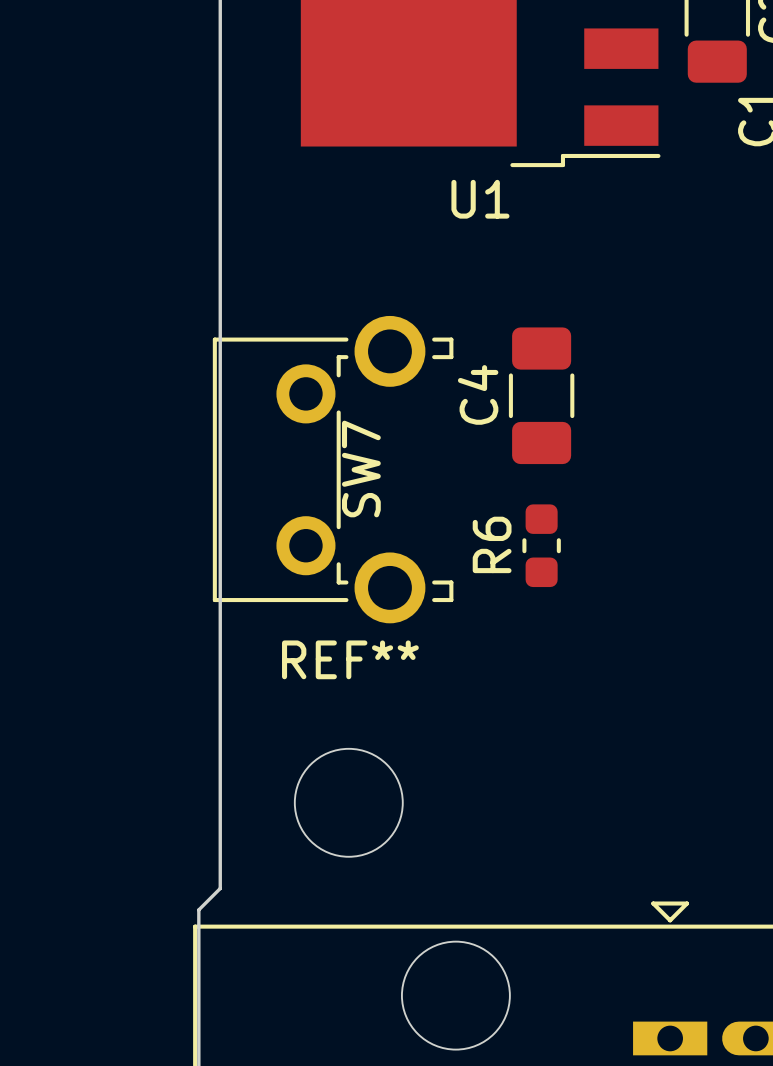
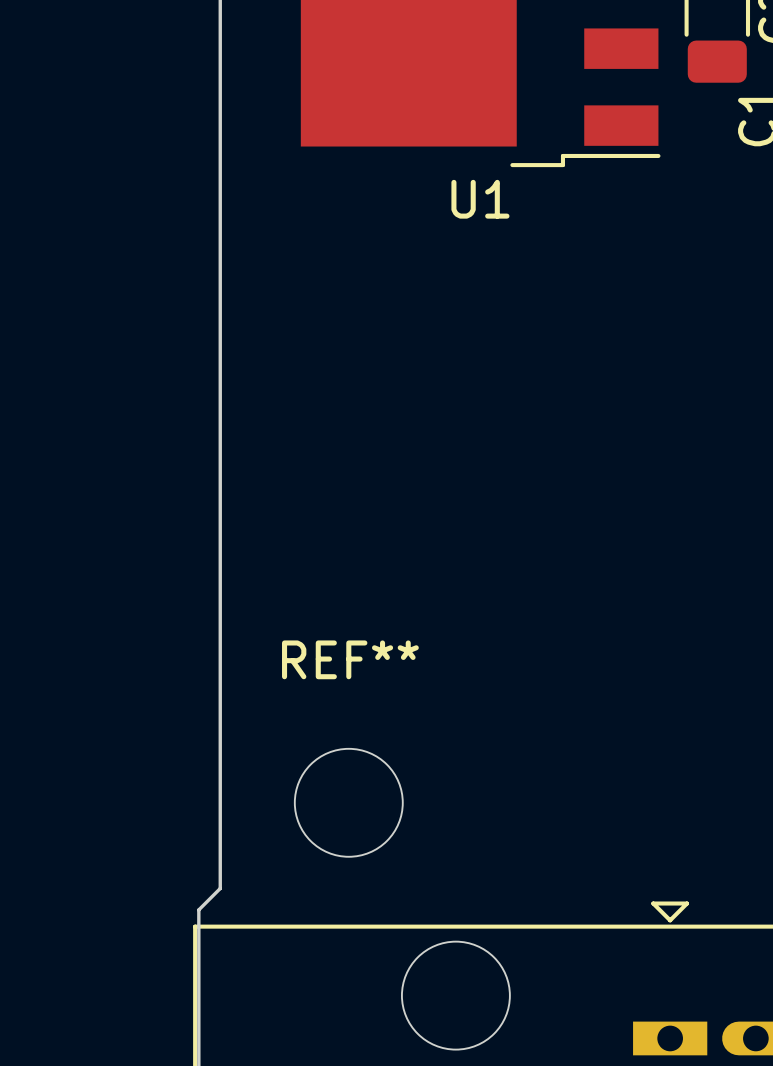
C4: (541, 395) -> none
SW7: (333, 469) -> none
R6: (541, 545) -> none

